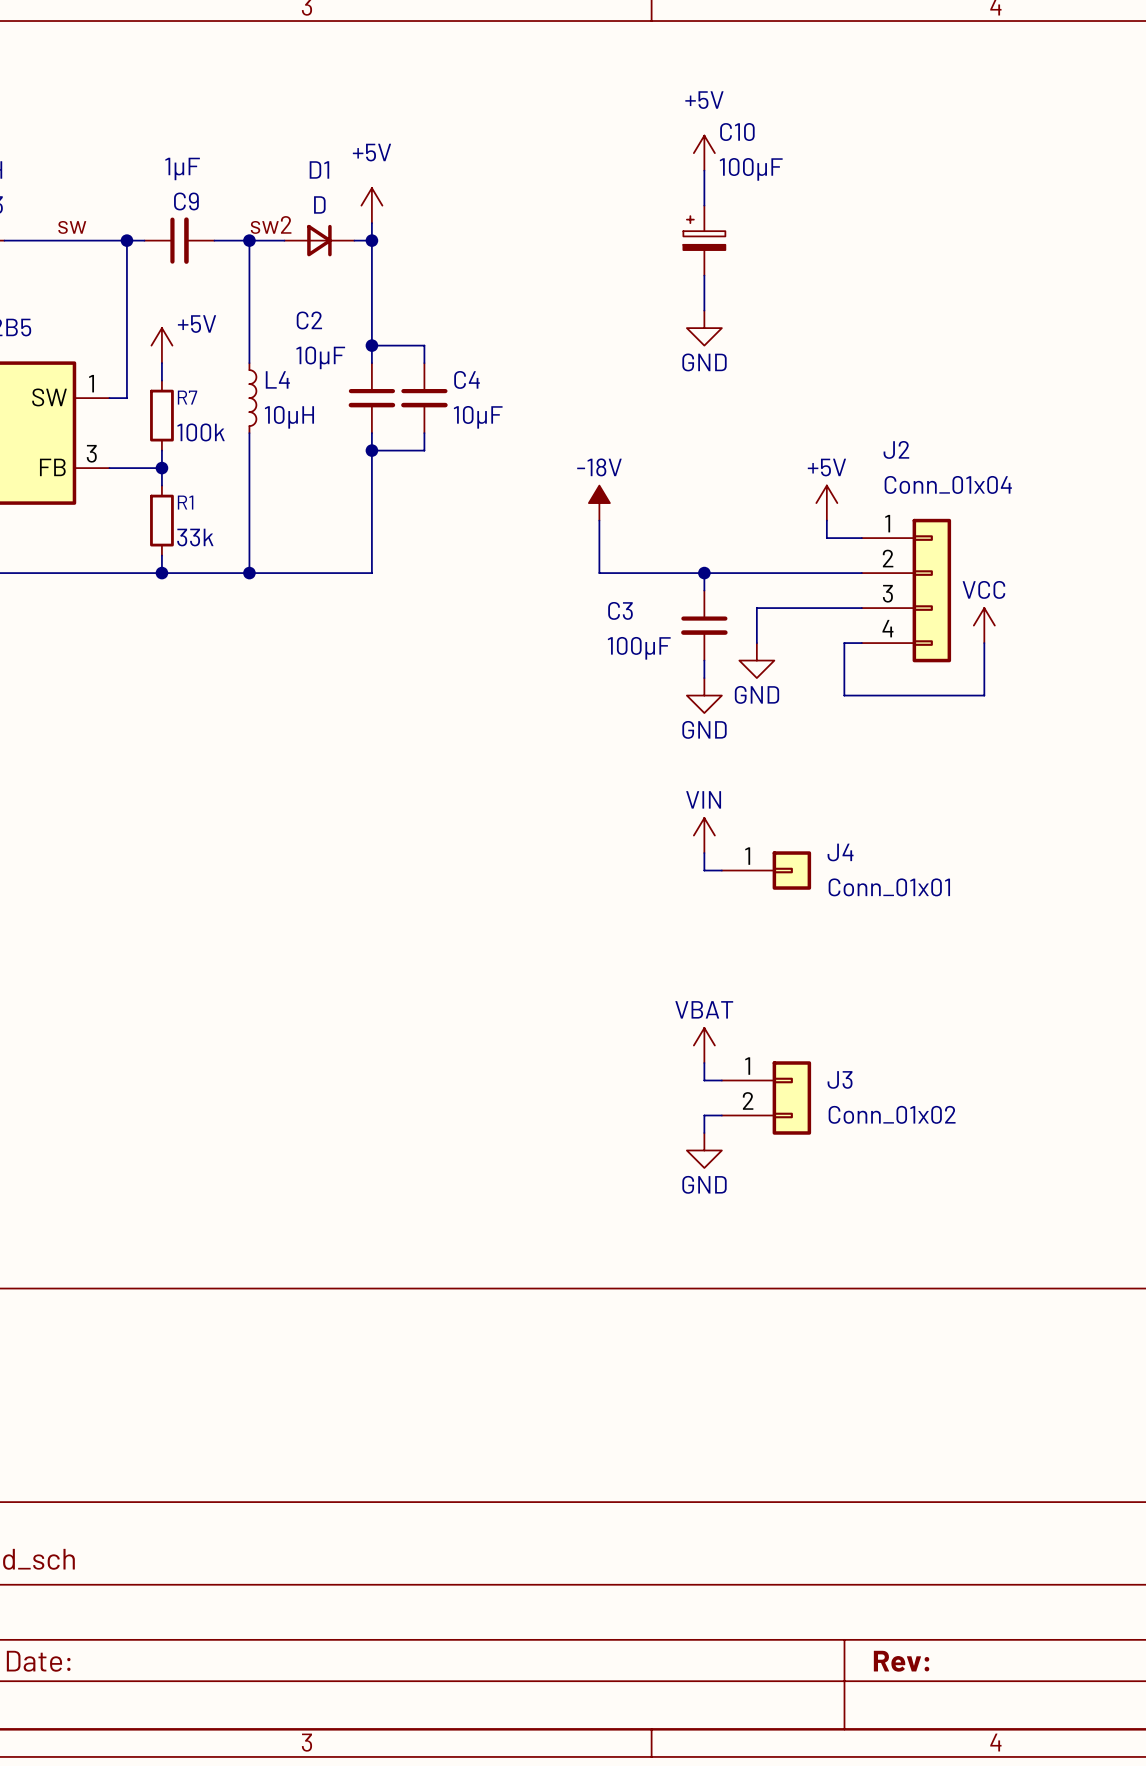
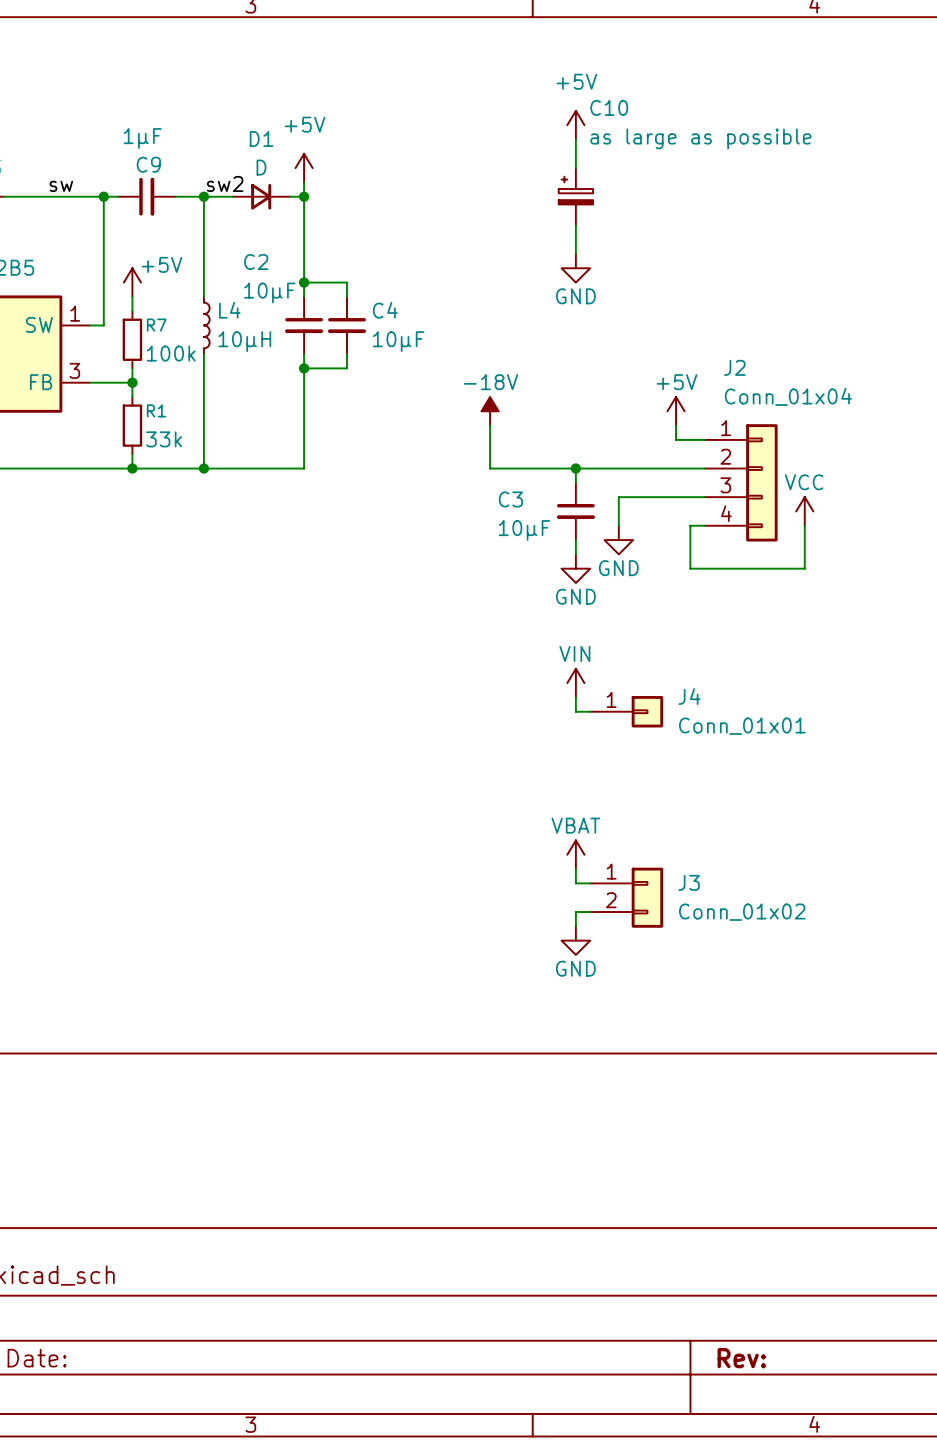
C10 value: 100µF (751, 169) -> as large as possible (700, 138)
C3 value: 100µF (639, 648) -> 10µF (524, 530)

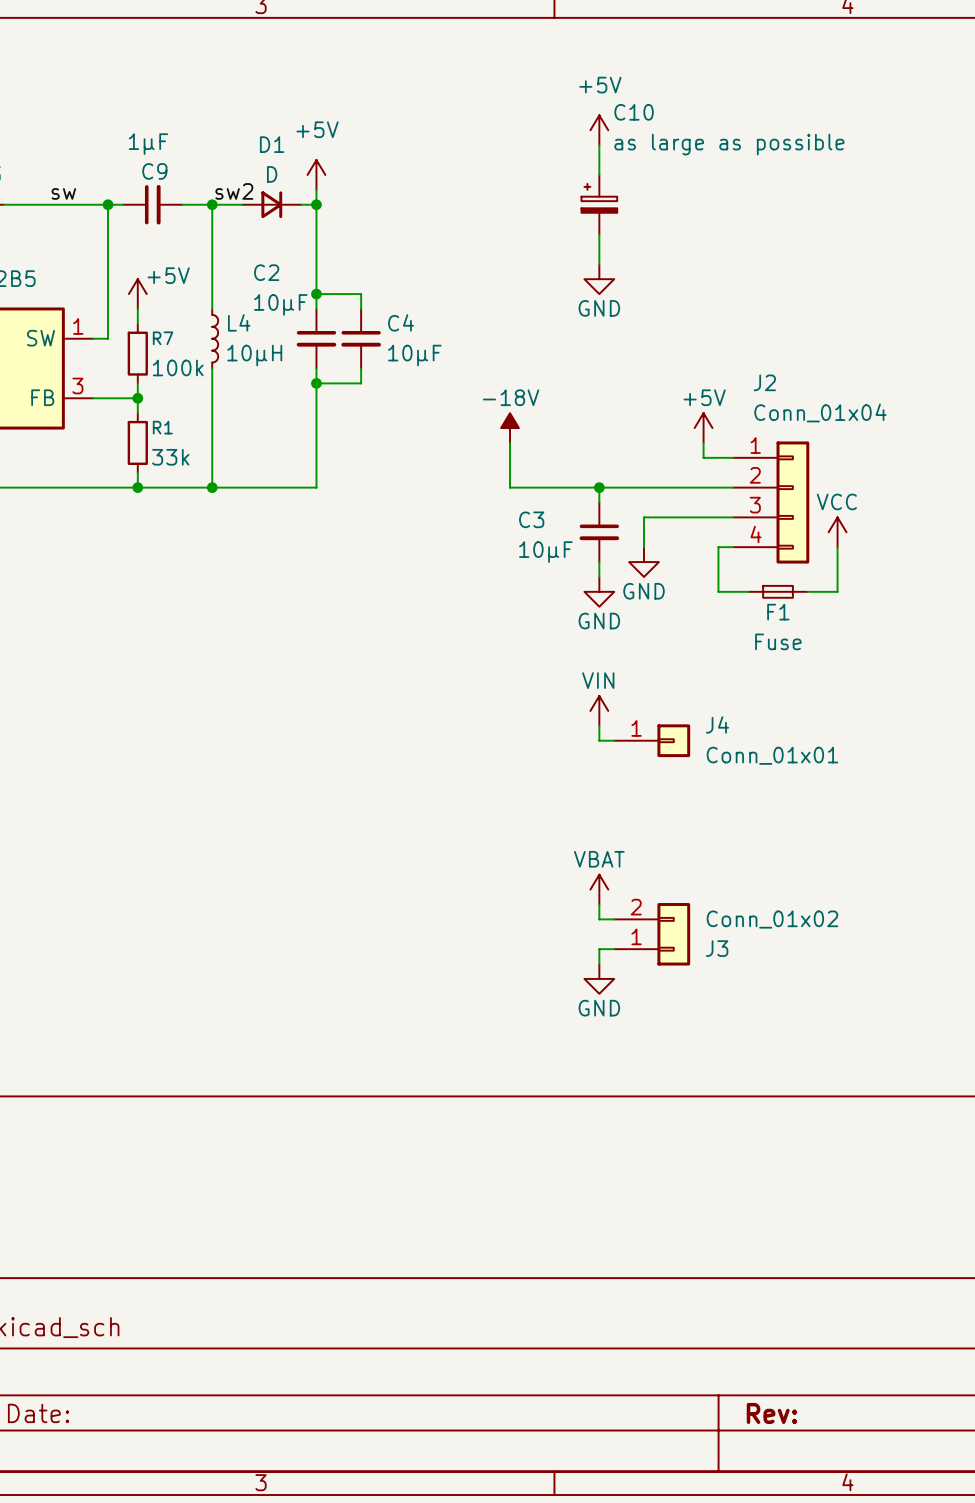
F1: none -> Fuse (778, 591)
J3 flip: as is (647, 897) -> up-down (673, 934)

